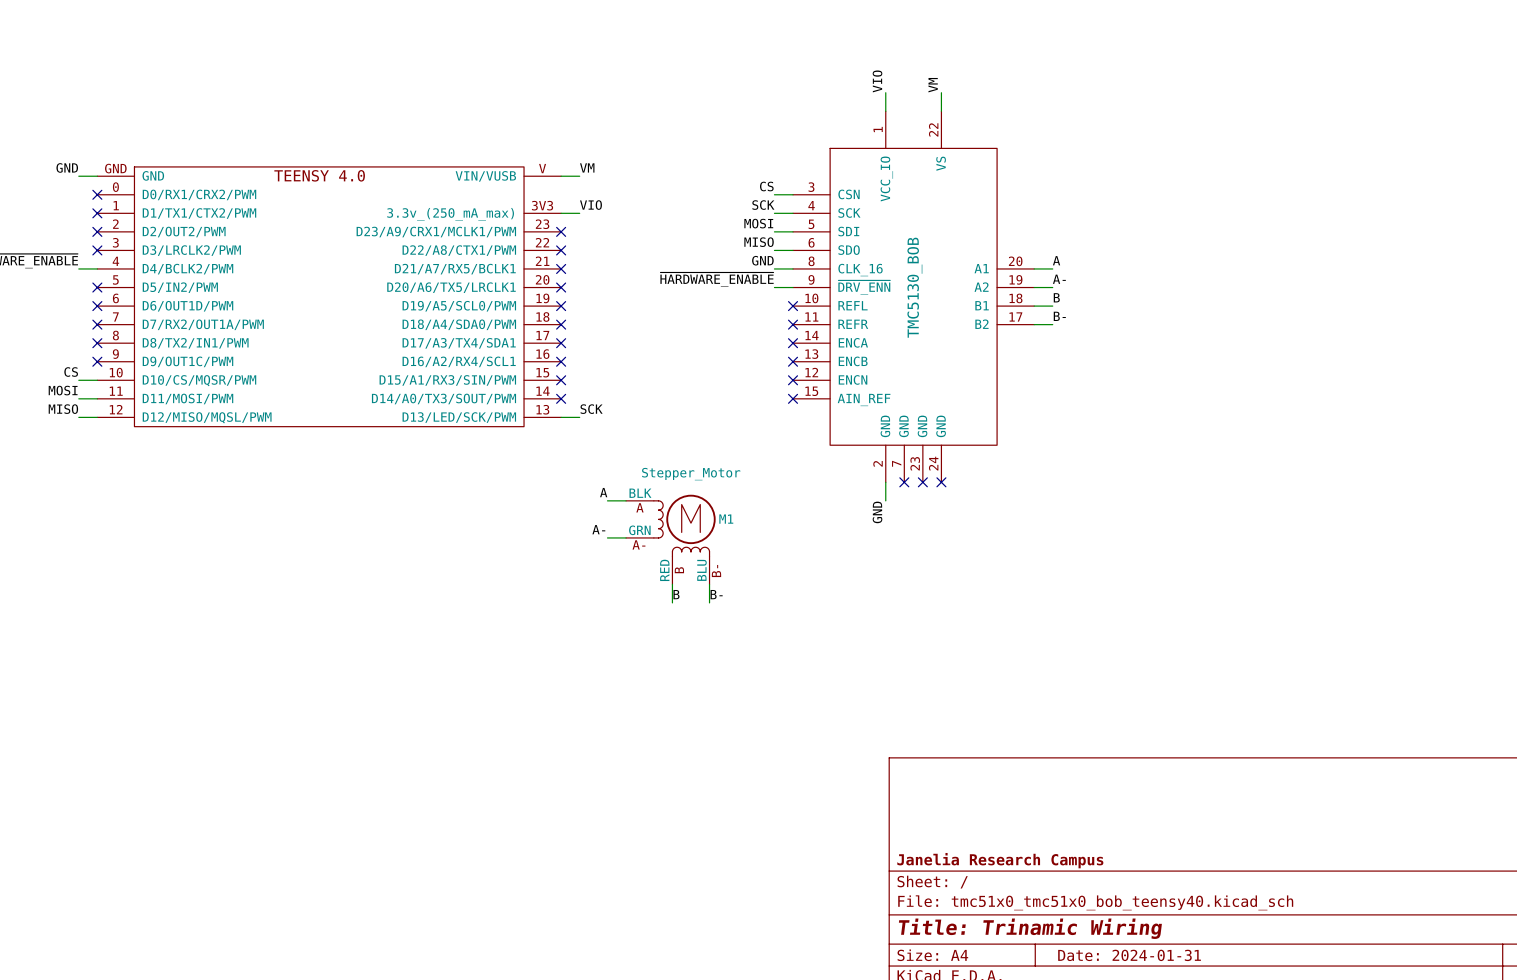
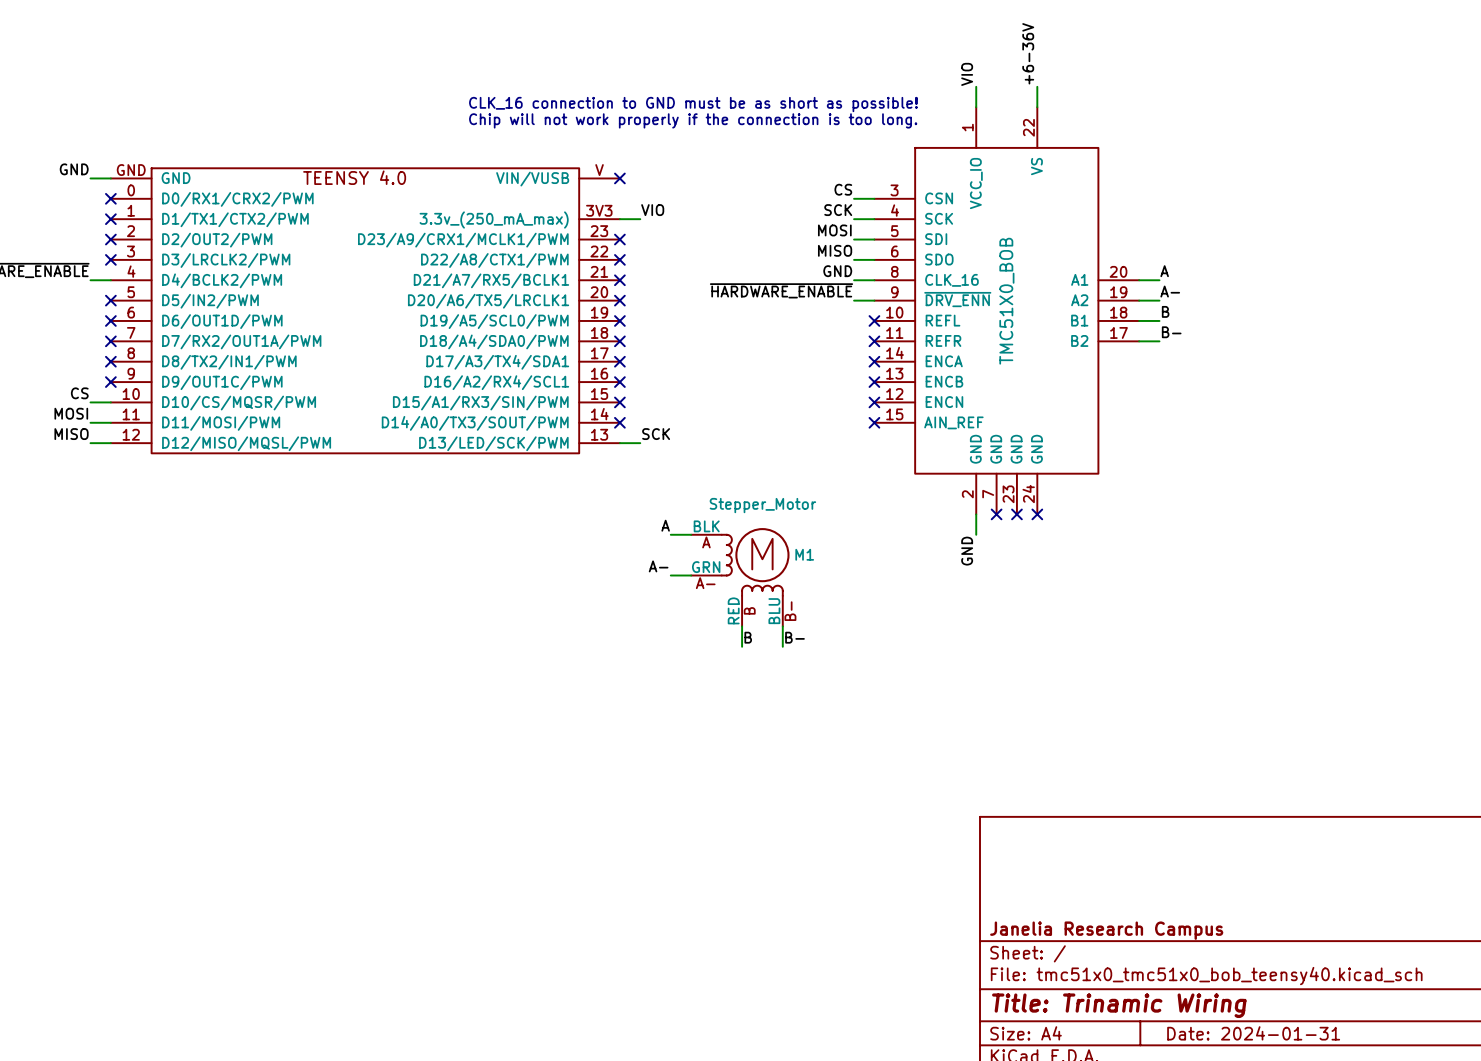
label: VM (933, 85) -> +6-36V (1028, 53)
text: none -> CLK_16 connection to GND must be as short as possible! (693, 104)
text: none -> Chip will not work properly if the connection is too long. (693, 120)
label: VM (587, 167) -> none
wire: (561, 176) (579, 176) -> none
no-connect mark: none -> (619, 178)
part value: TMC5130_BOB (914, 287) -> TMC51X0_BOB (1006, 301)

